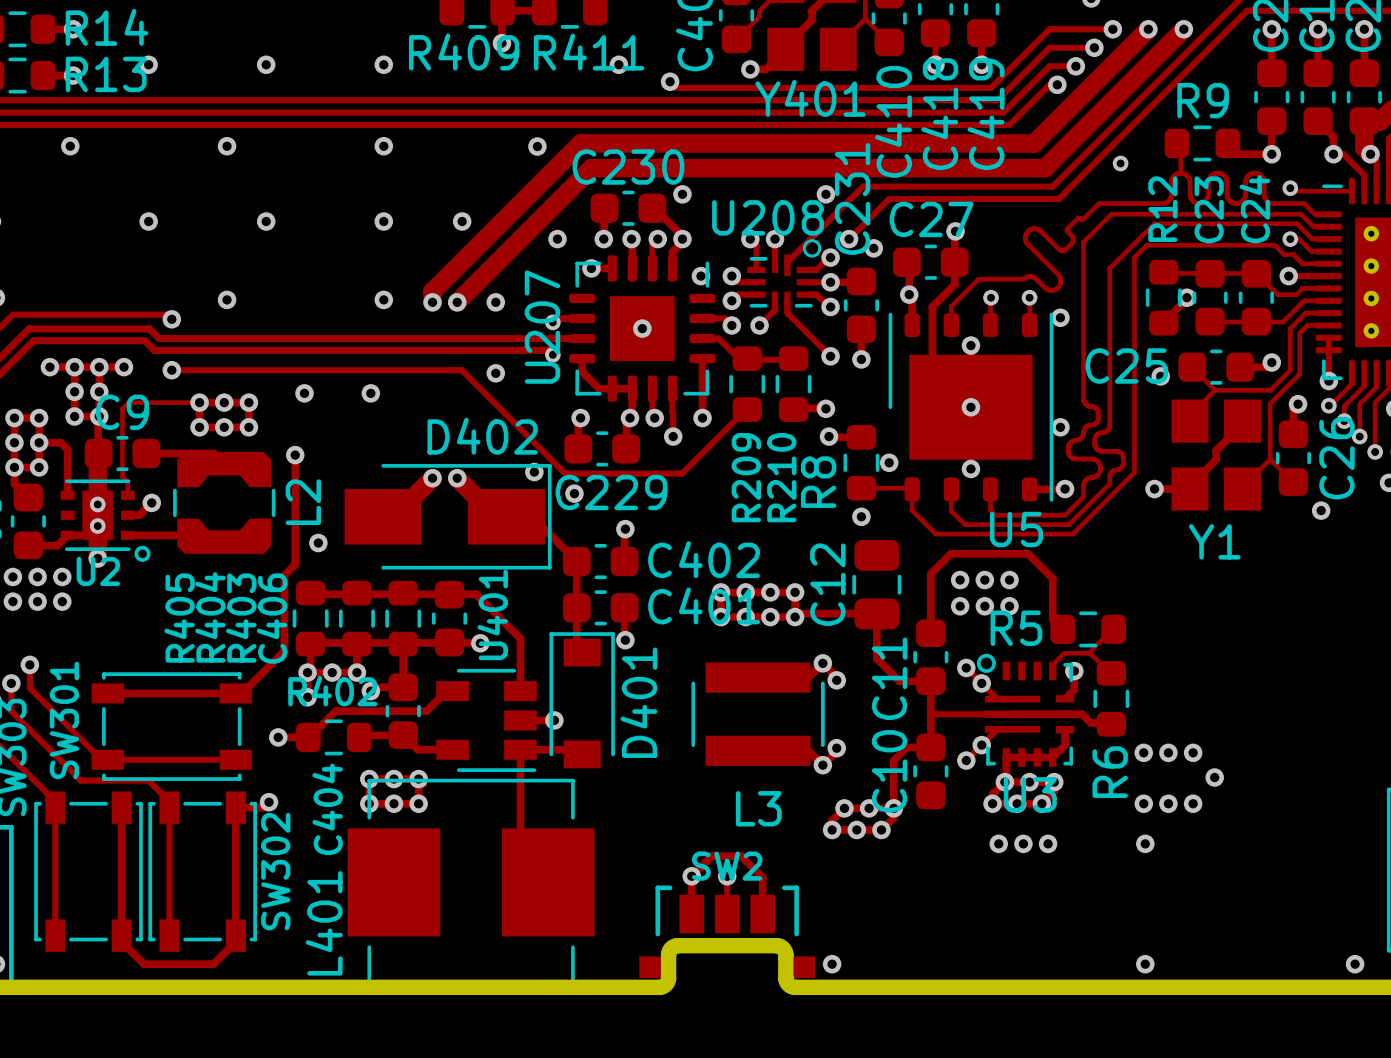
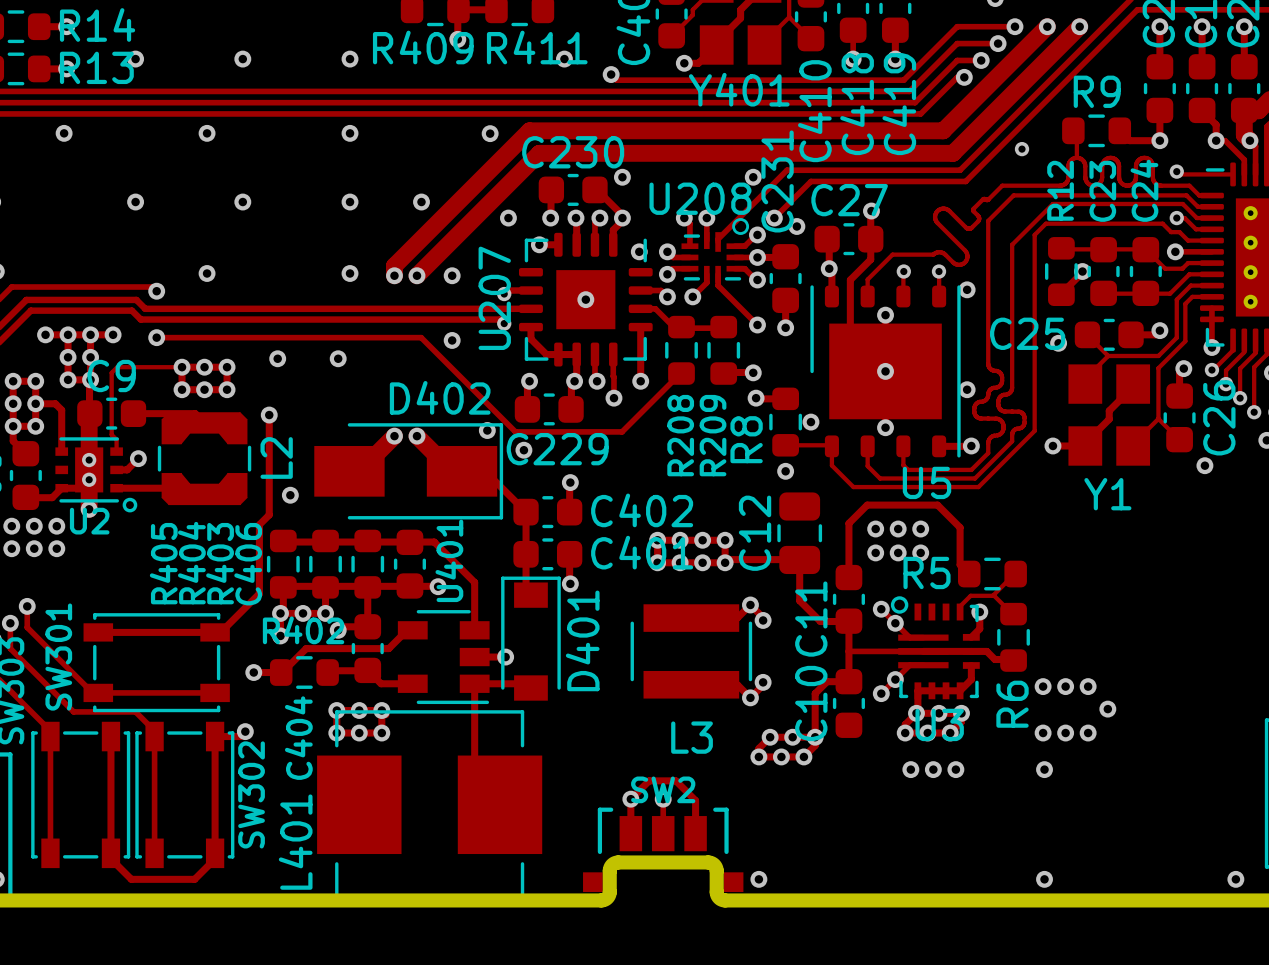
R209 name: R209 (746, 477) -> R208 (680, 435)
R210 name: R210 (781, 477) -> R209 (713, 435)

